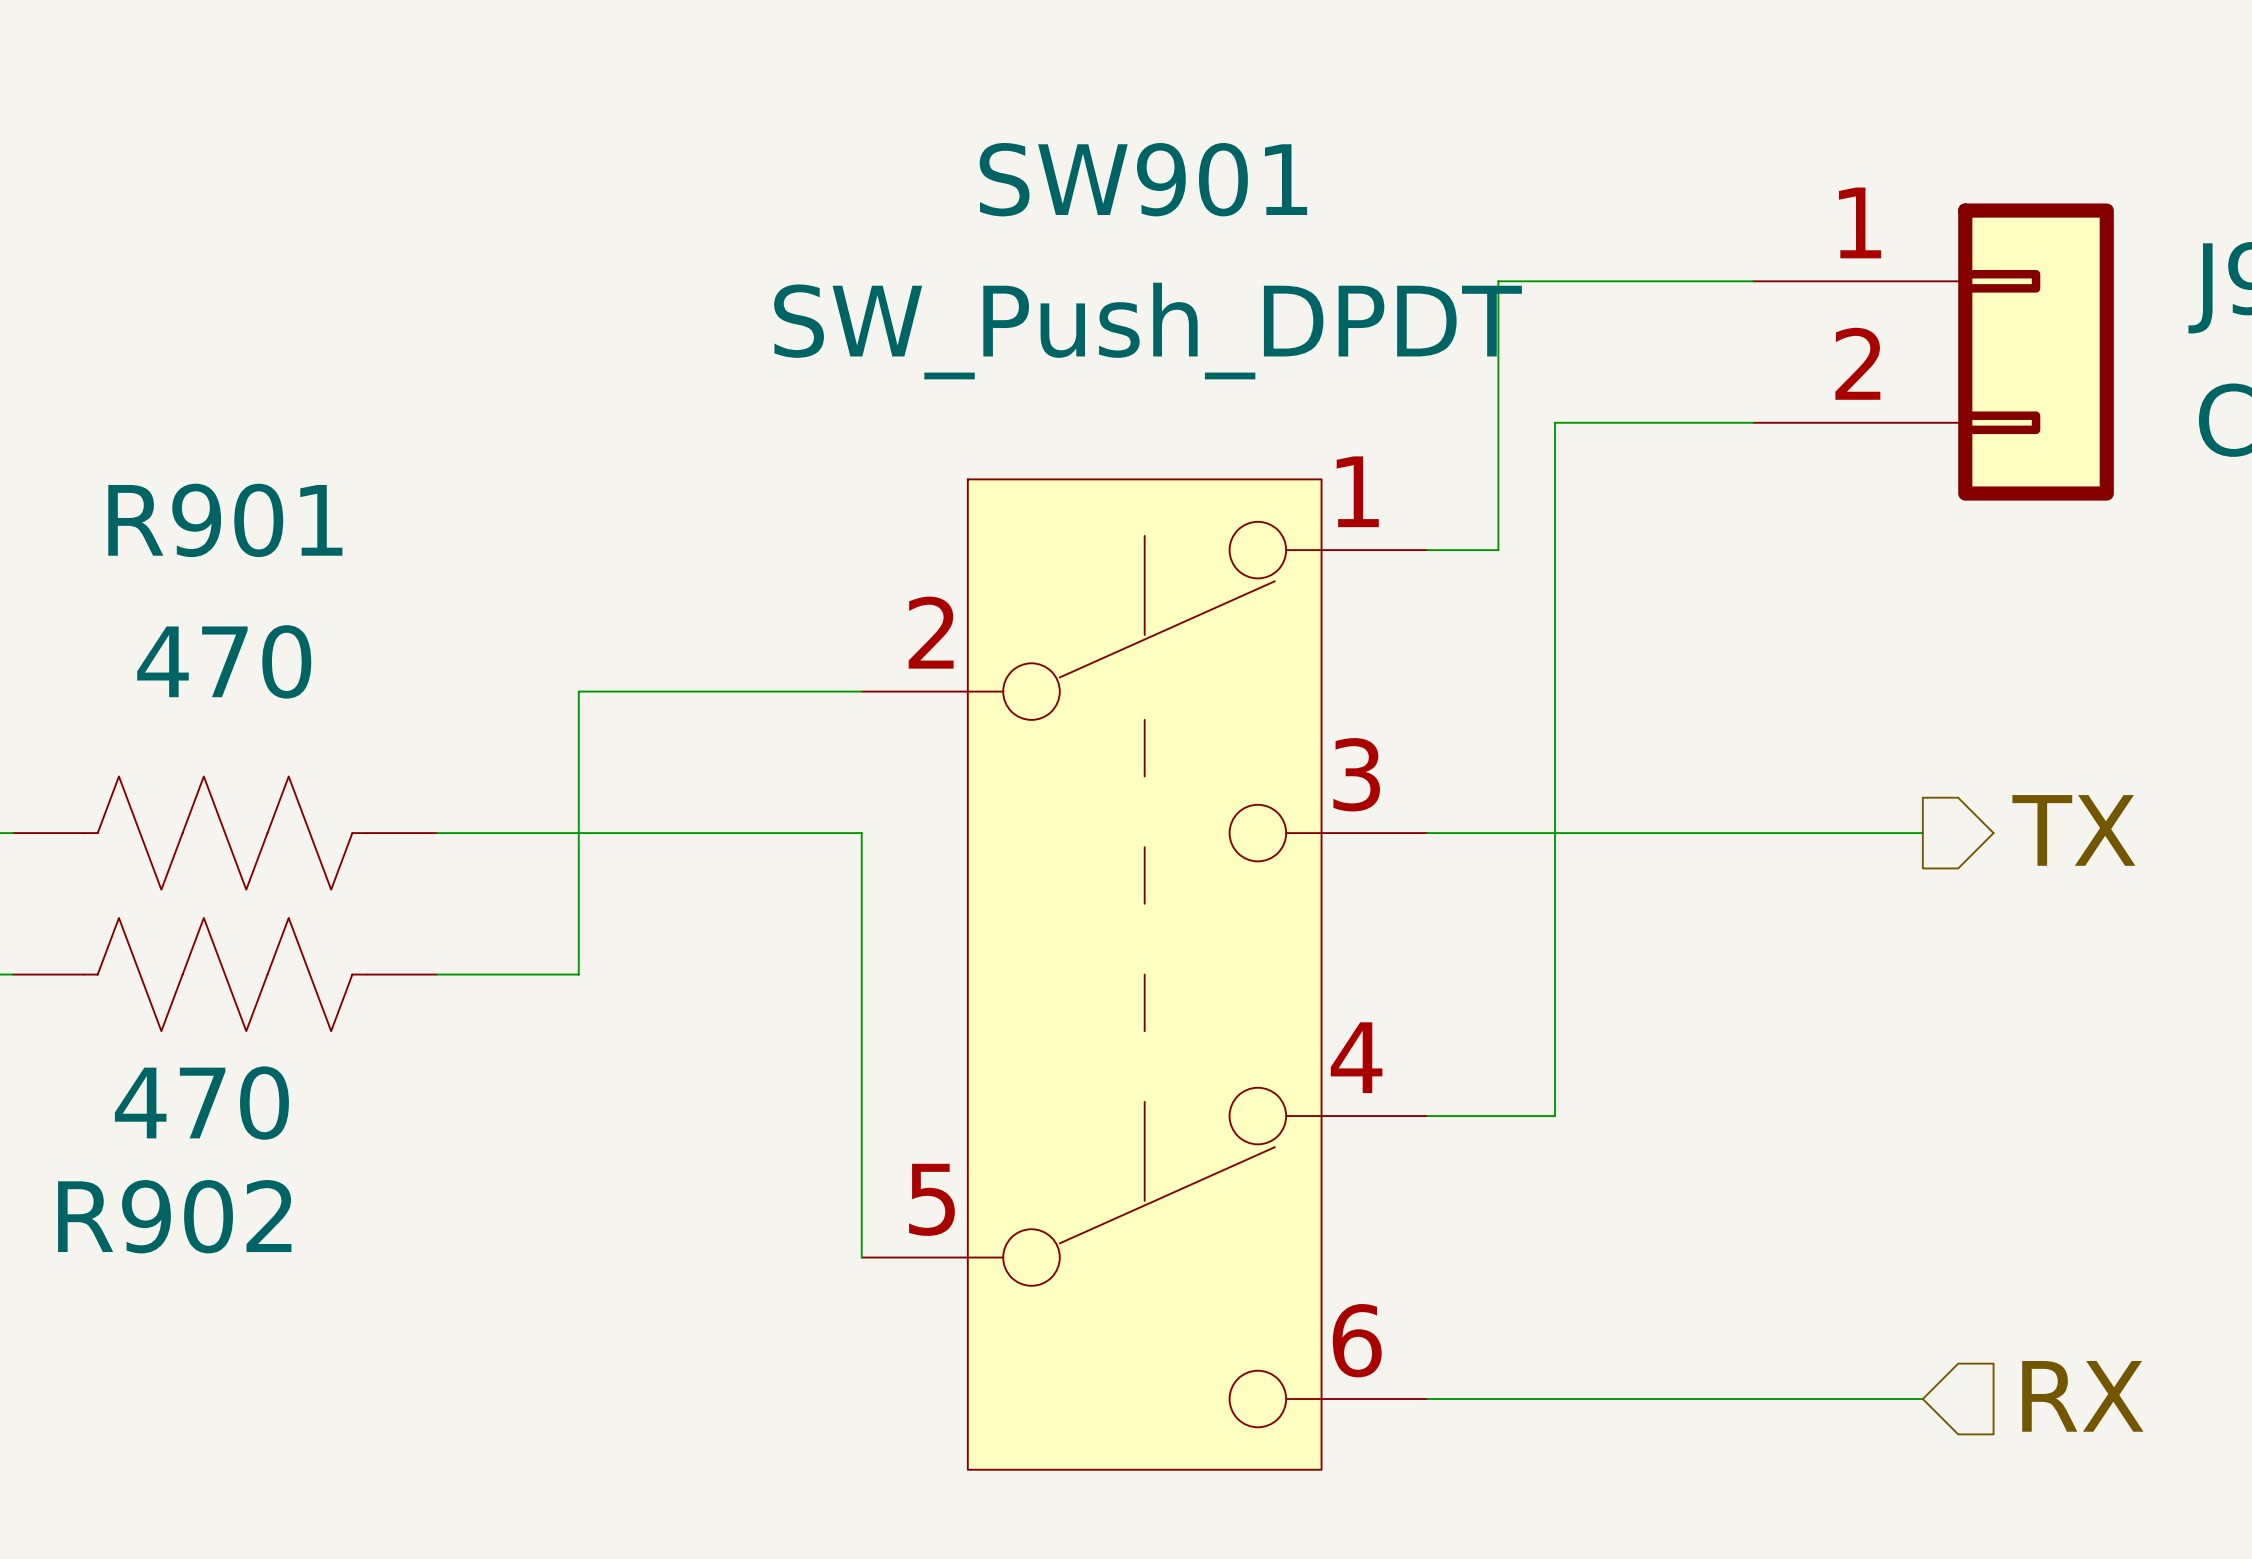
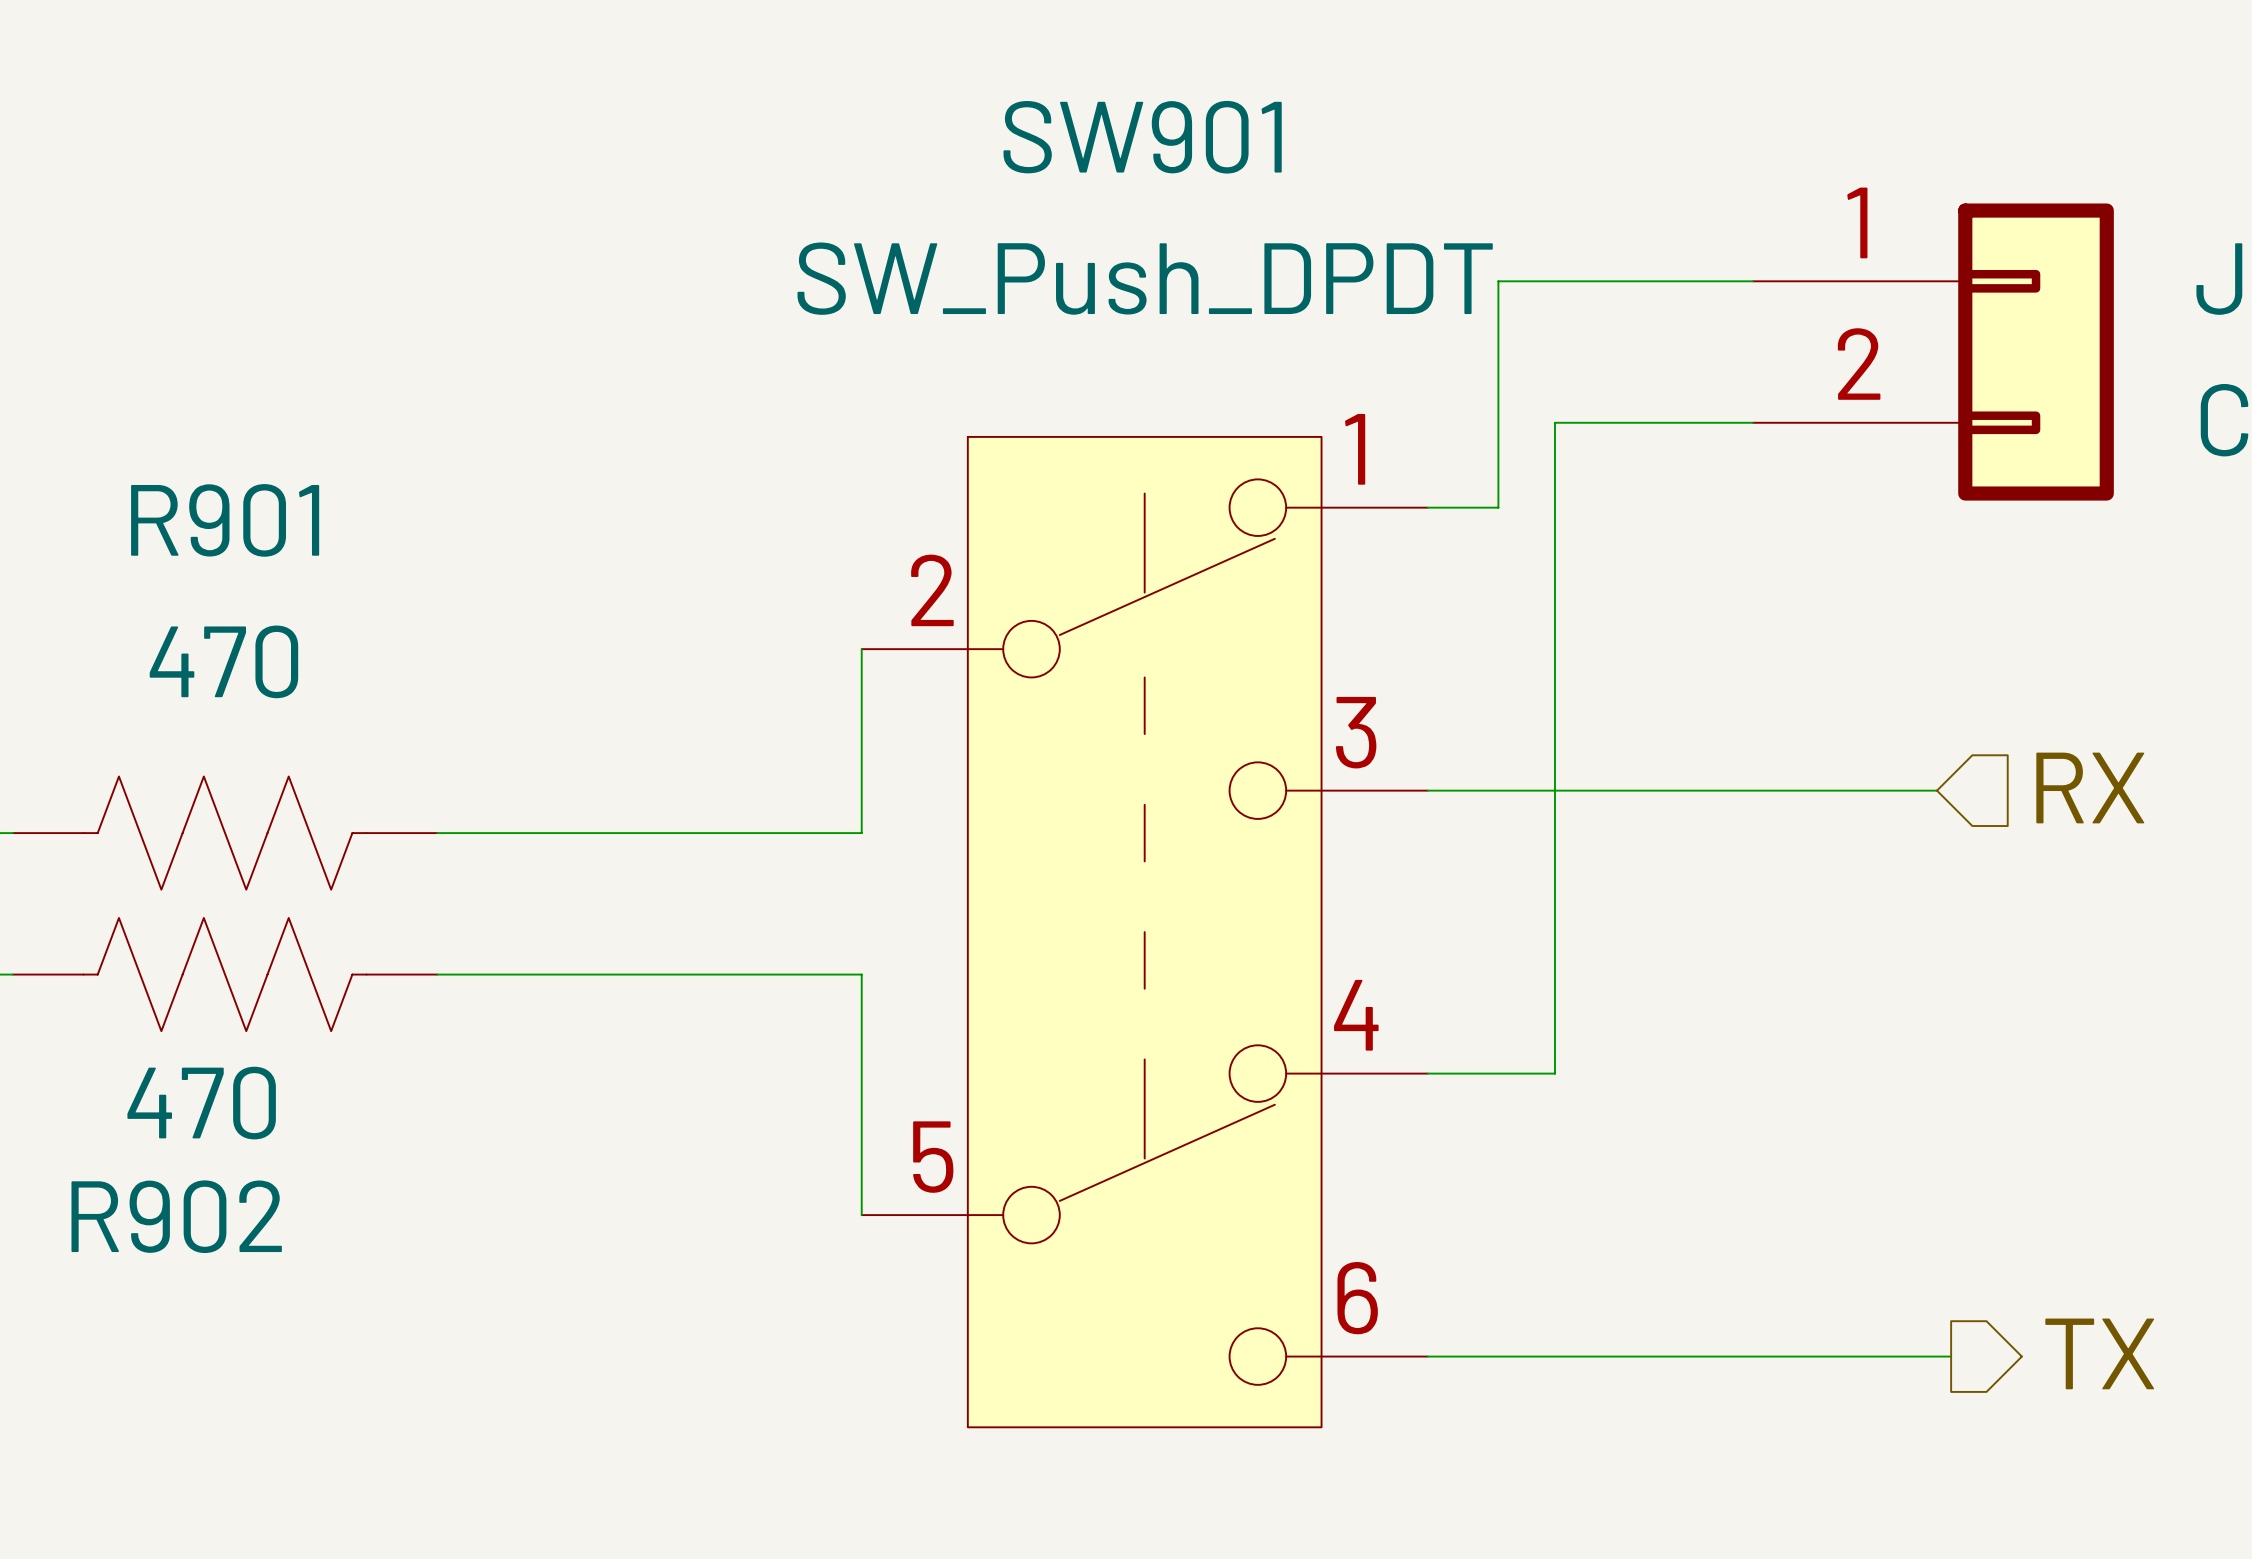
wire: (1498, 507) (1498, 550) (1427, 550) -> (1498, 507) (1427, 507)
wire: (861, 691) (578, 691) (578, 974) -> (861, 974) (578, 974)
wire: none -> (1427, 790) (1936, 790)
hierarchical label position: TX (2073, 830) -> TX (2099, 1353)
wire: (861, 833) (861, 974) -> (861, 833) (861, 649)
wire: (1427, 833) (1922, 833) -> none
SW901 position: (1144, 974) -> (1144, 932)
wire: (1554, 1073) (1554, 1116) (1427, 1116) -> (1554, 1073) (1427, 1073)
wire: (861, 1215) (861, 1257) -> none
wire: none -> (1427, 1356) (1951, 1356)
hierarchical label position: RX (2082, 1396) -> RX (2090, 787)
wire: (1427, 1399) (1922, 1399) -> none

